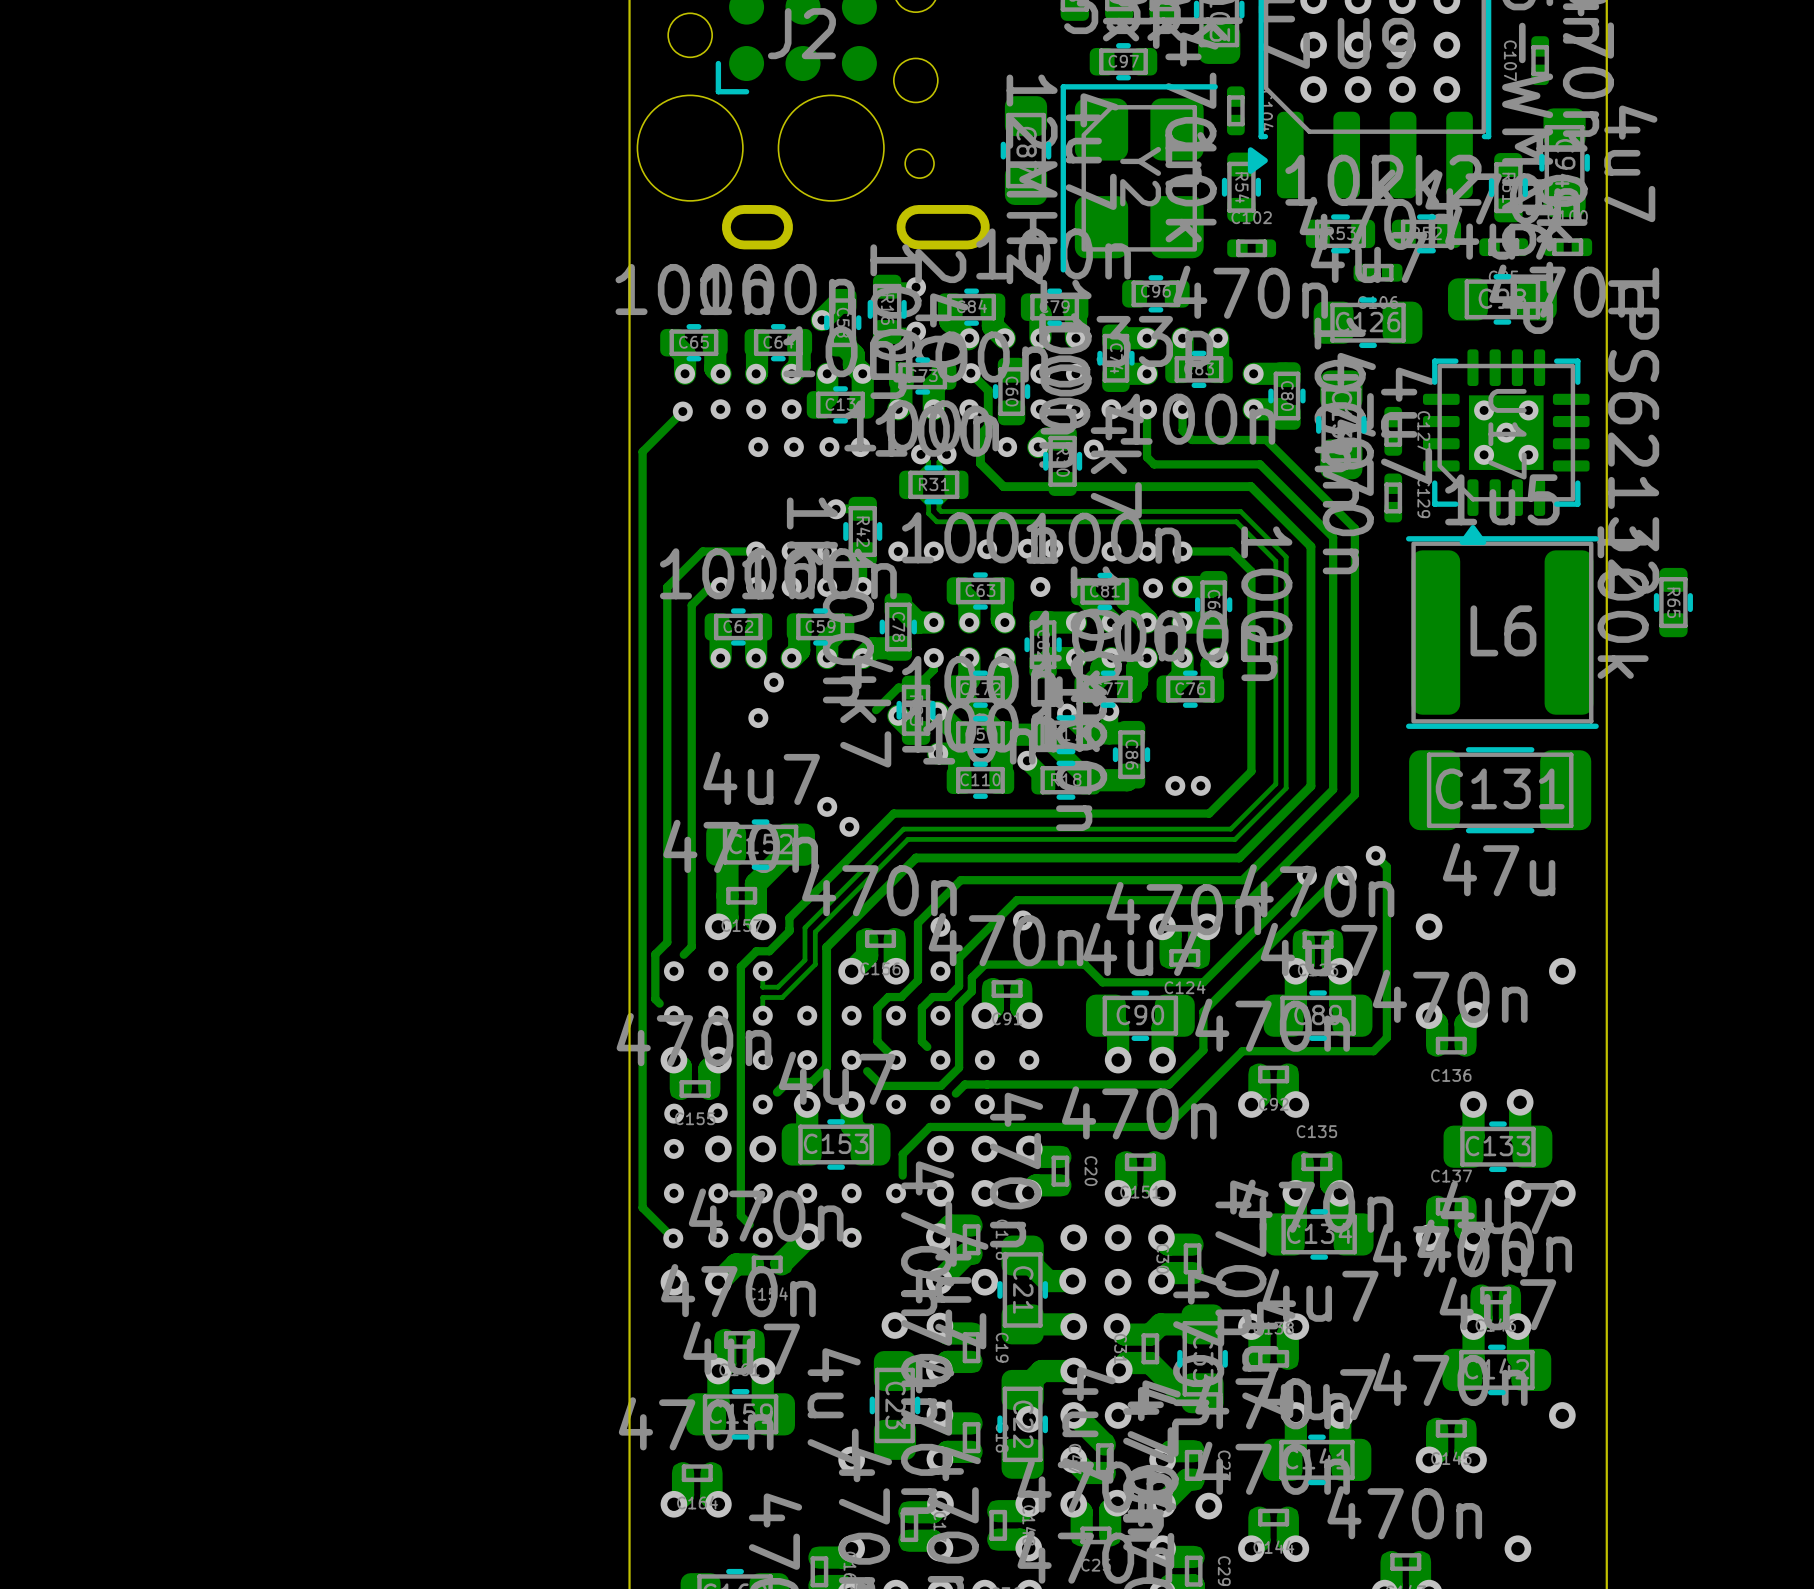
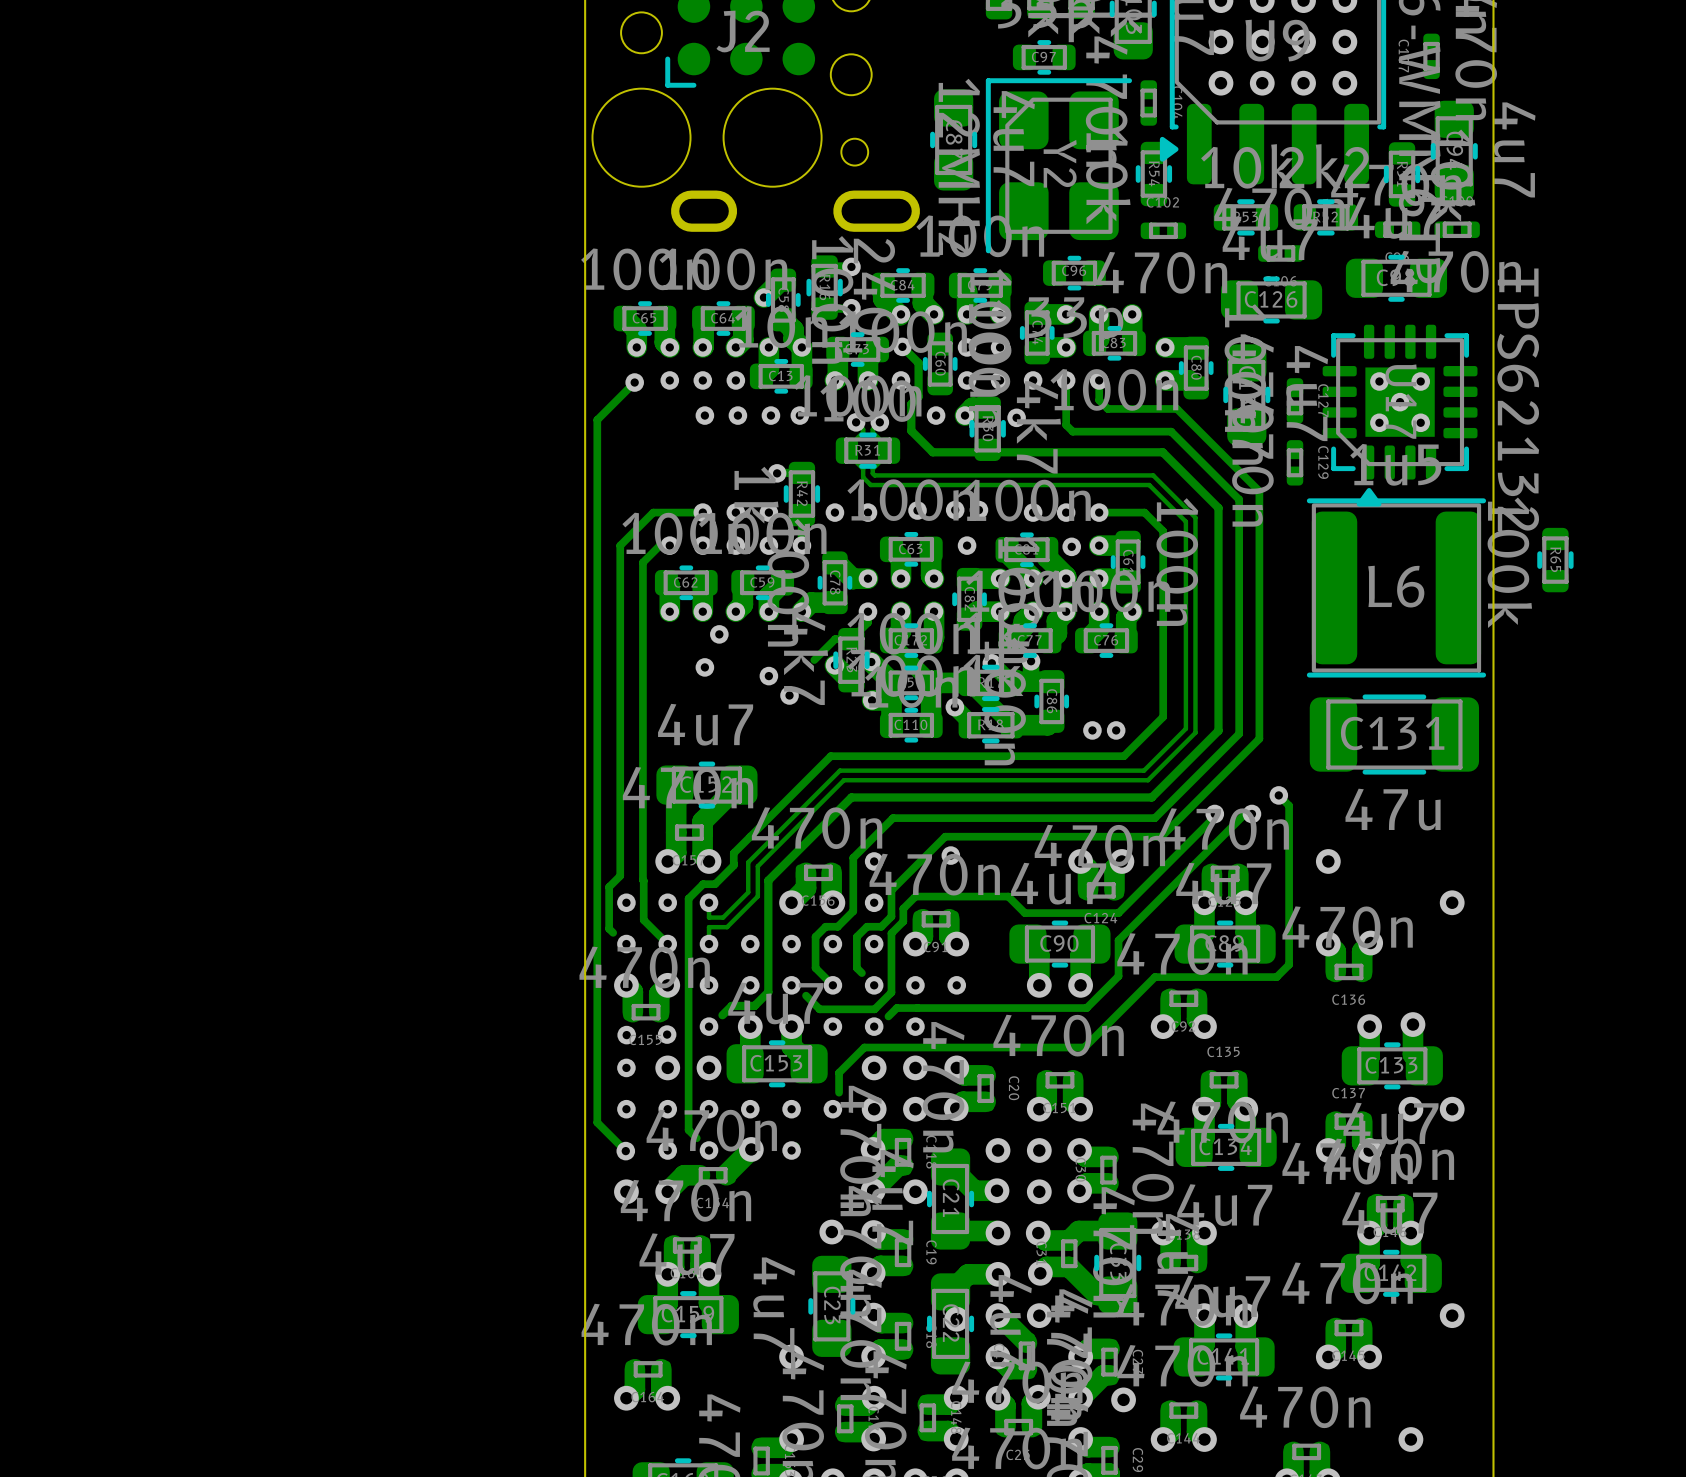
via: none -> (768, 676)
via: none -> (789, 695)
via: (827, 806) -> none
via: (849, 826) -> none
track: (691, 946) (683, 954) -> (642, 880) (643, 920) (667, 944)

